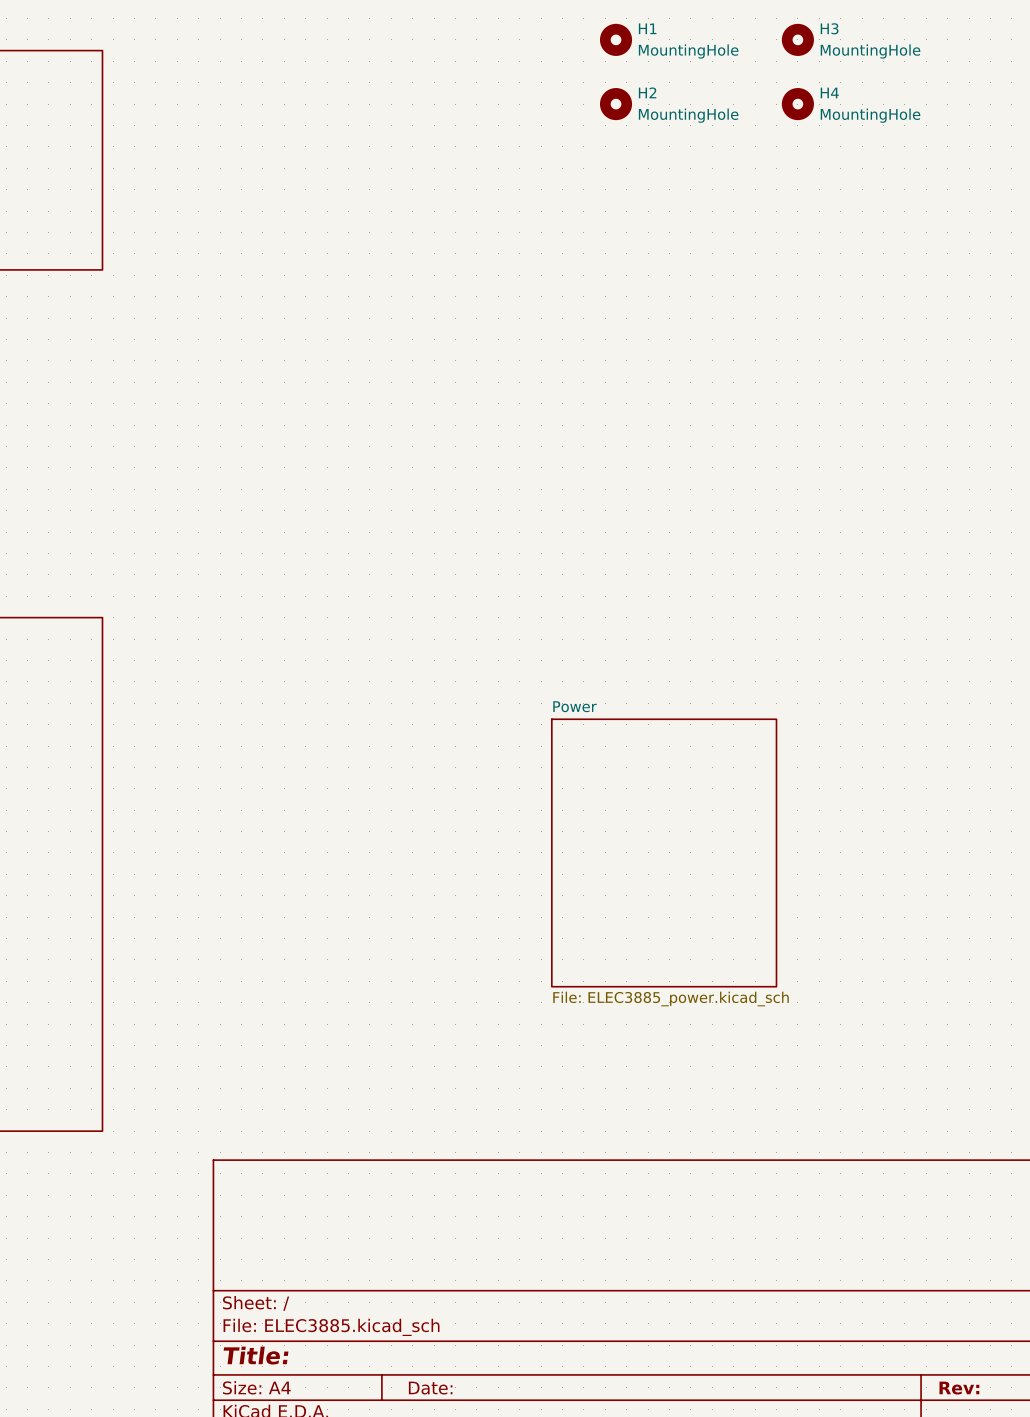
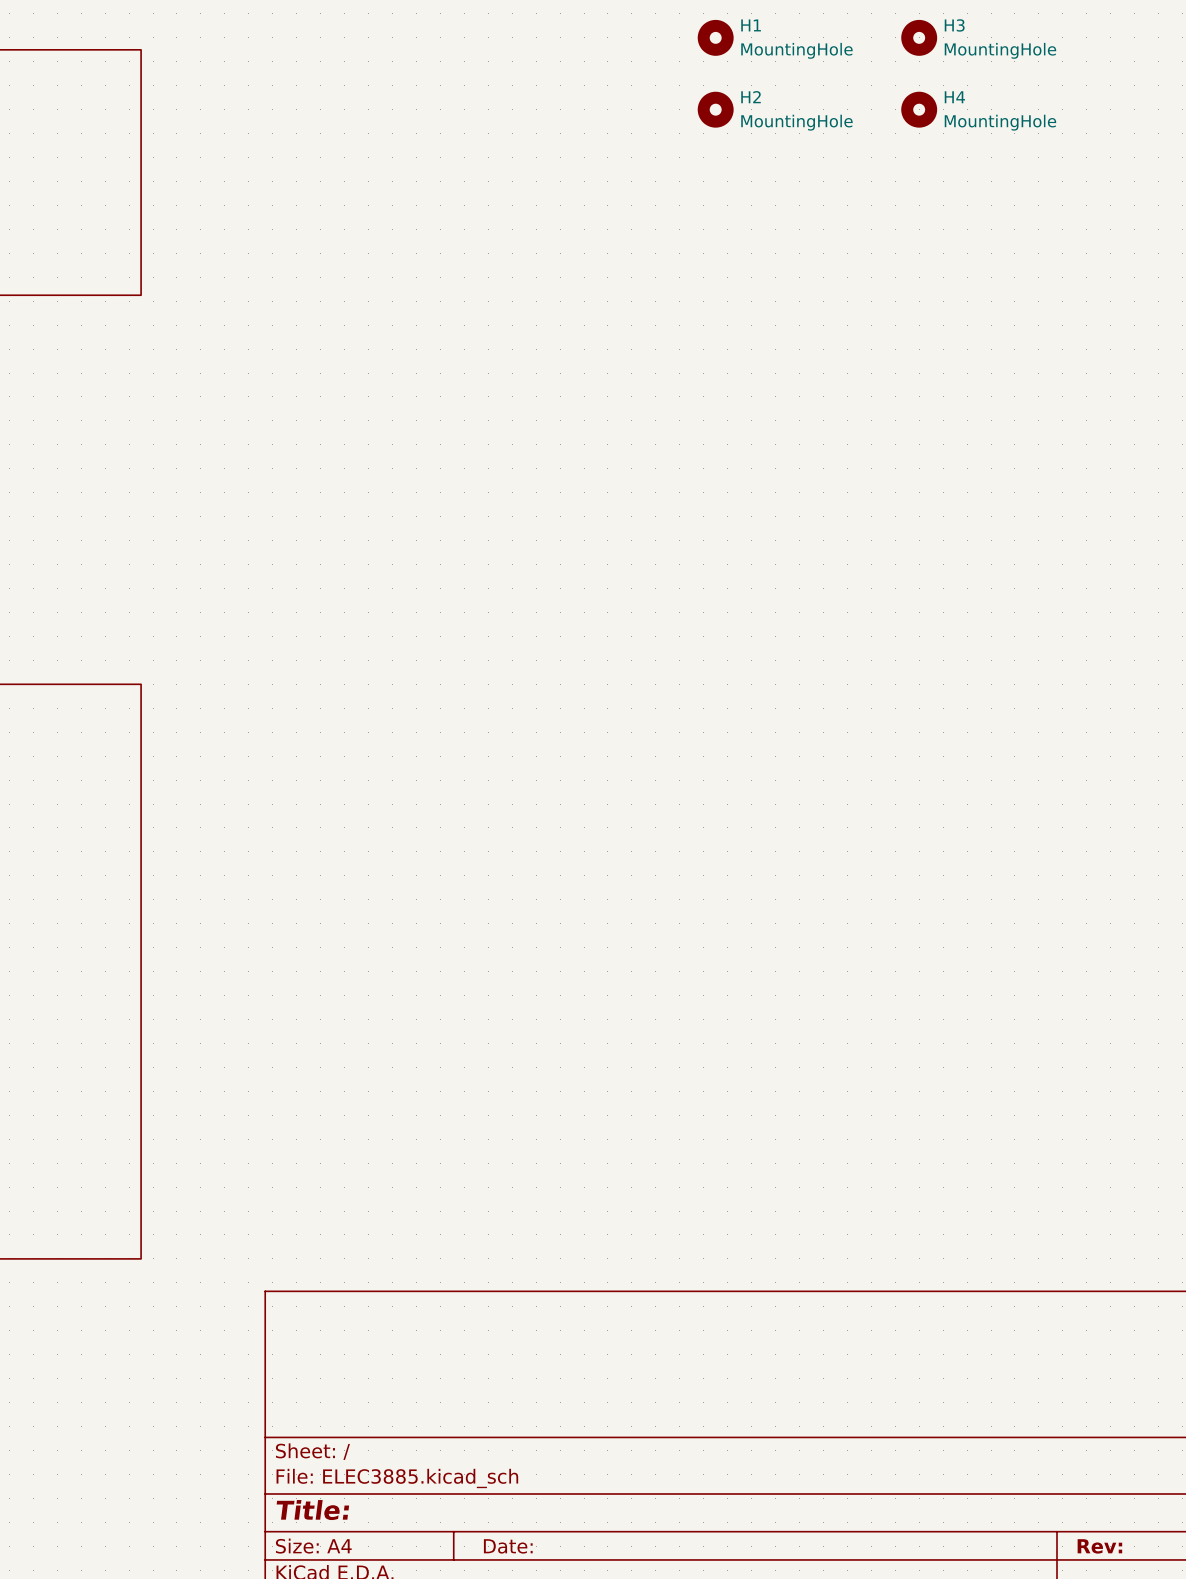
sheet Power: File: ELEC3885_power.kicad_sch (664, 852) -> none

